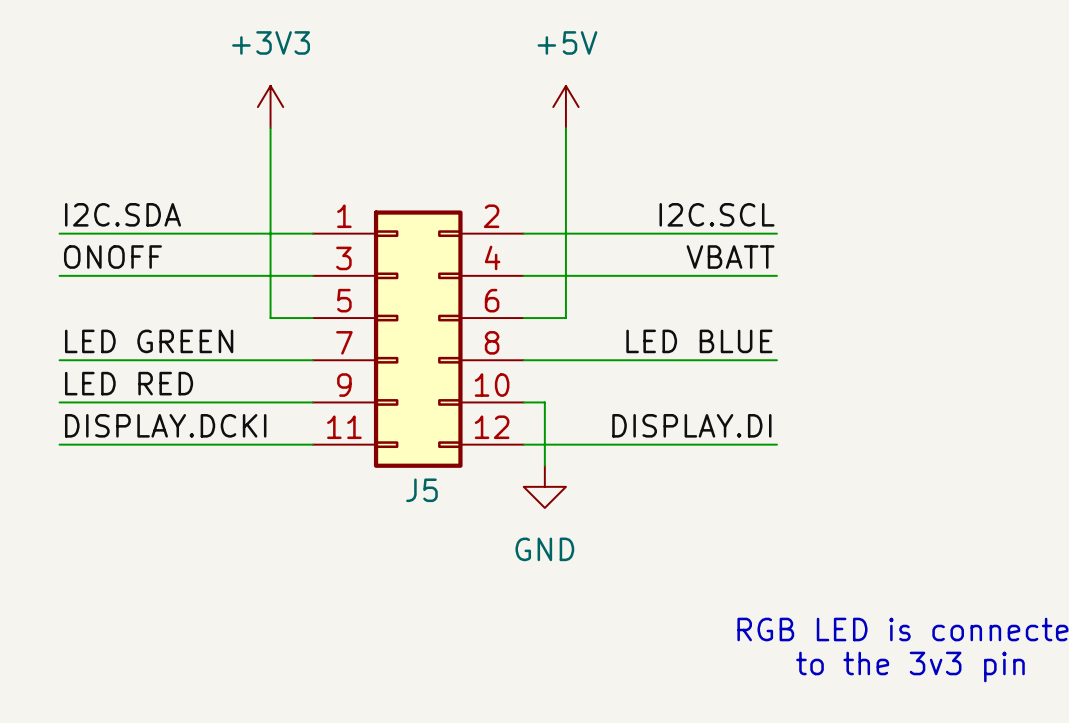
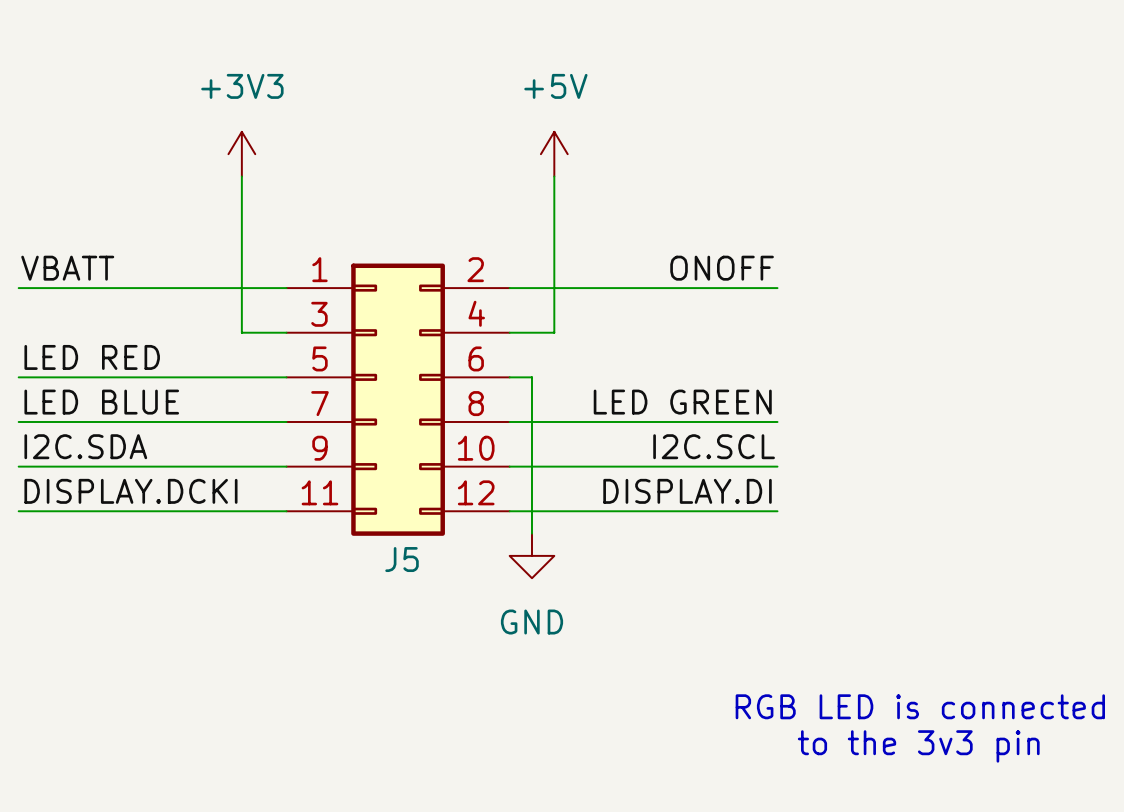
label: I2C.SDA (123, 214) -> VBATT (67, 268)
label: I2C.SCL (717, 214) -> ONOFF (722, 268)
label: ONOFF (112, 257) -> none
label: VBATT (730, 257) -> none
wire: (59, 275) (270, 275) (270, 318) -> (18, 377) (241, 377)
wire: (776, 275) (565, 275) (565, 318) (544, 318) -> (777, 466) (531, 466) (531, 377)
label: none -> LED RED (92, 357)
label: LED GREEN (149, 341) -> LED BLUE (101, 402)
label: LED BLUE (699, 341) -> LED GREEN (682, 402)
label: LED RED (129, 383) -> I2C.SDA (85, 446)
label: none -> I2C.SCL (714, 446)

